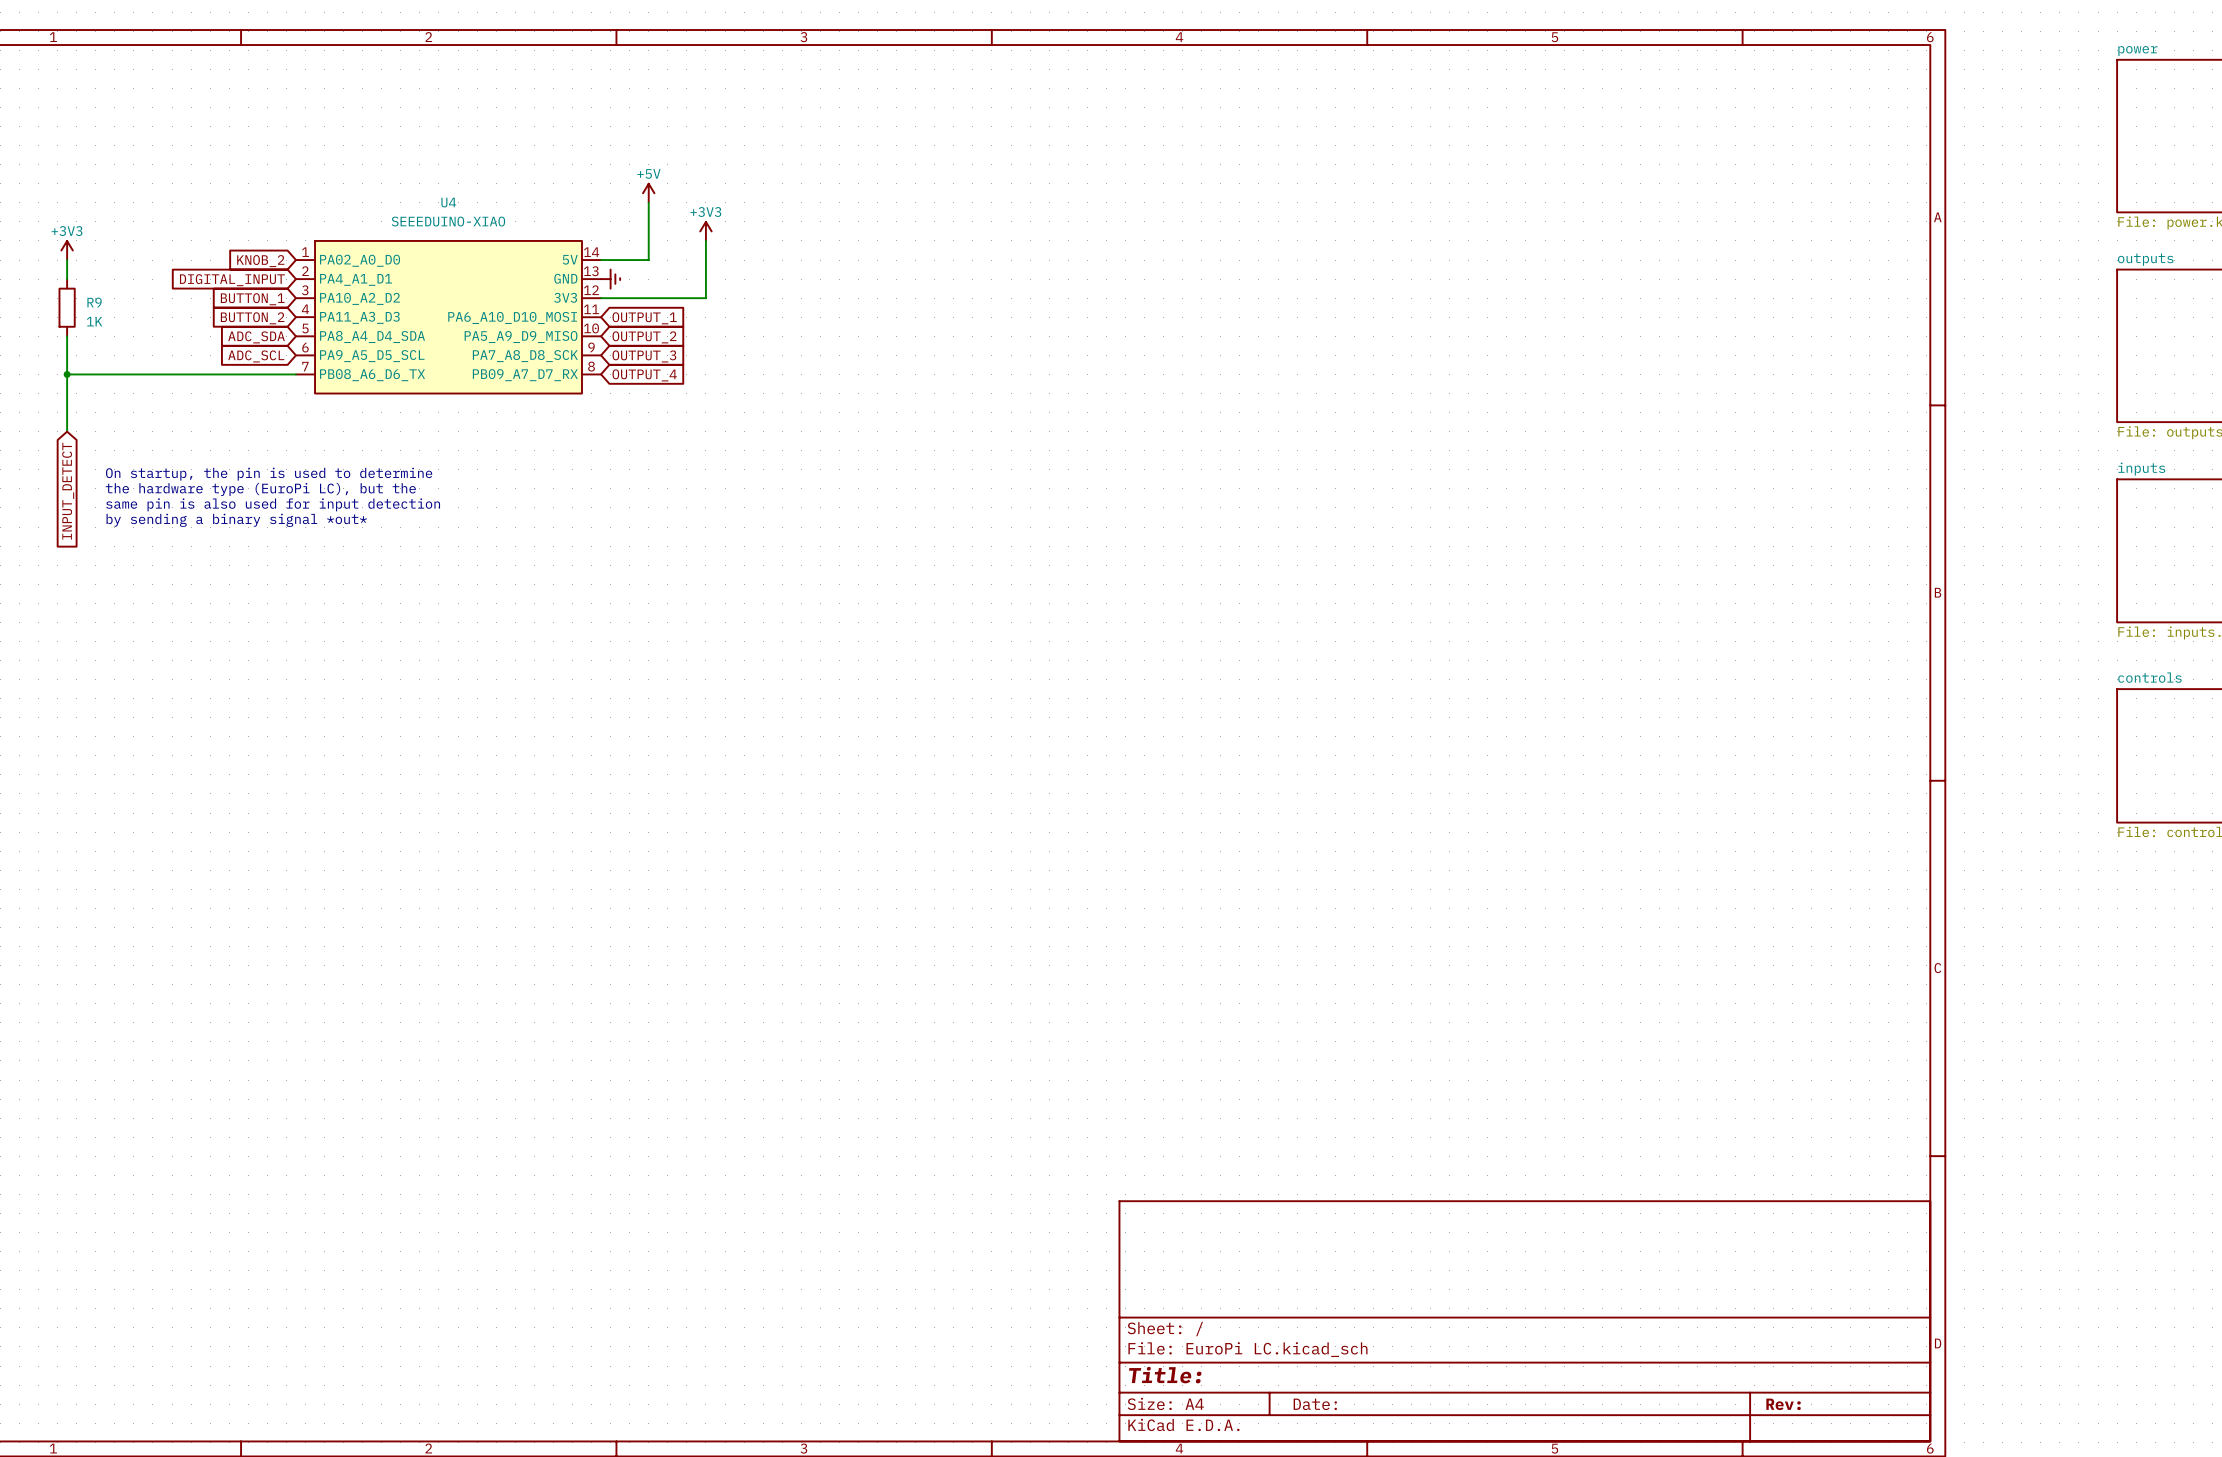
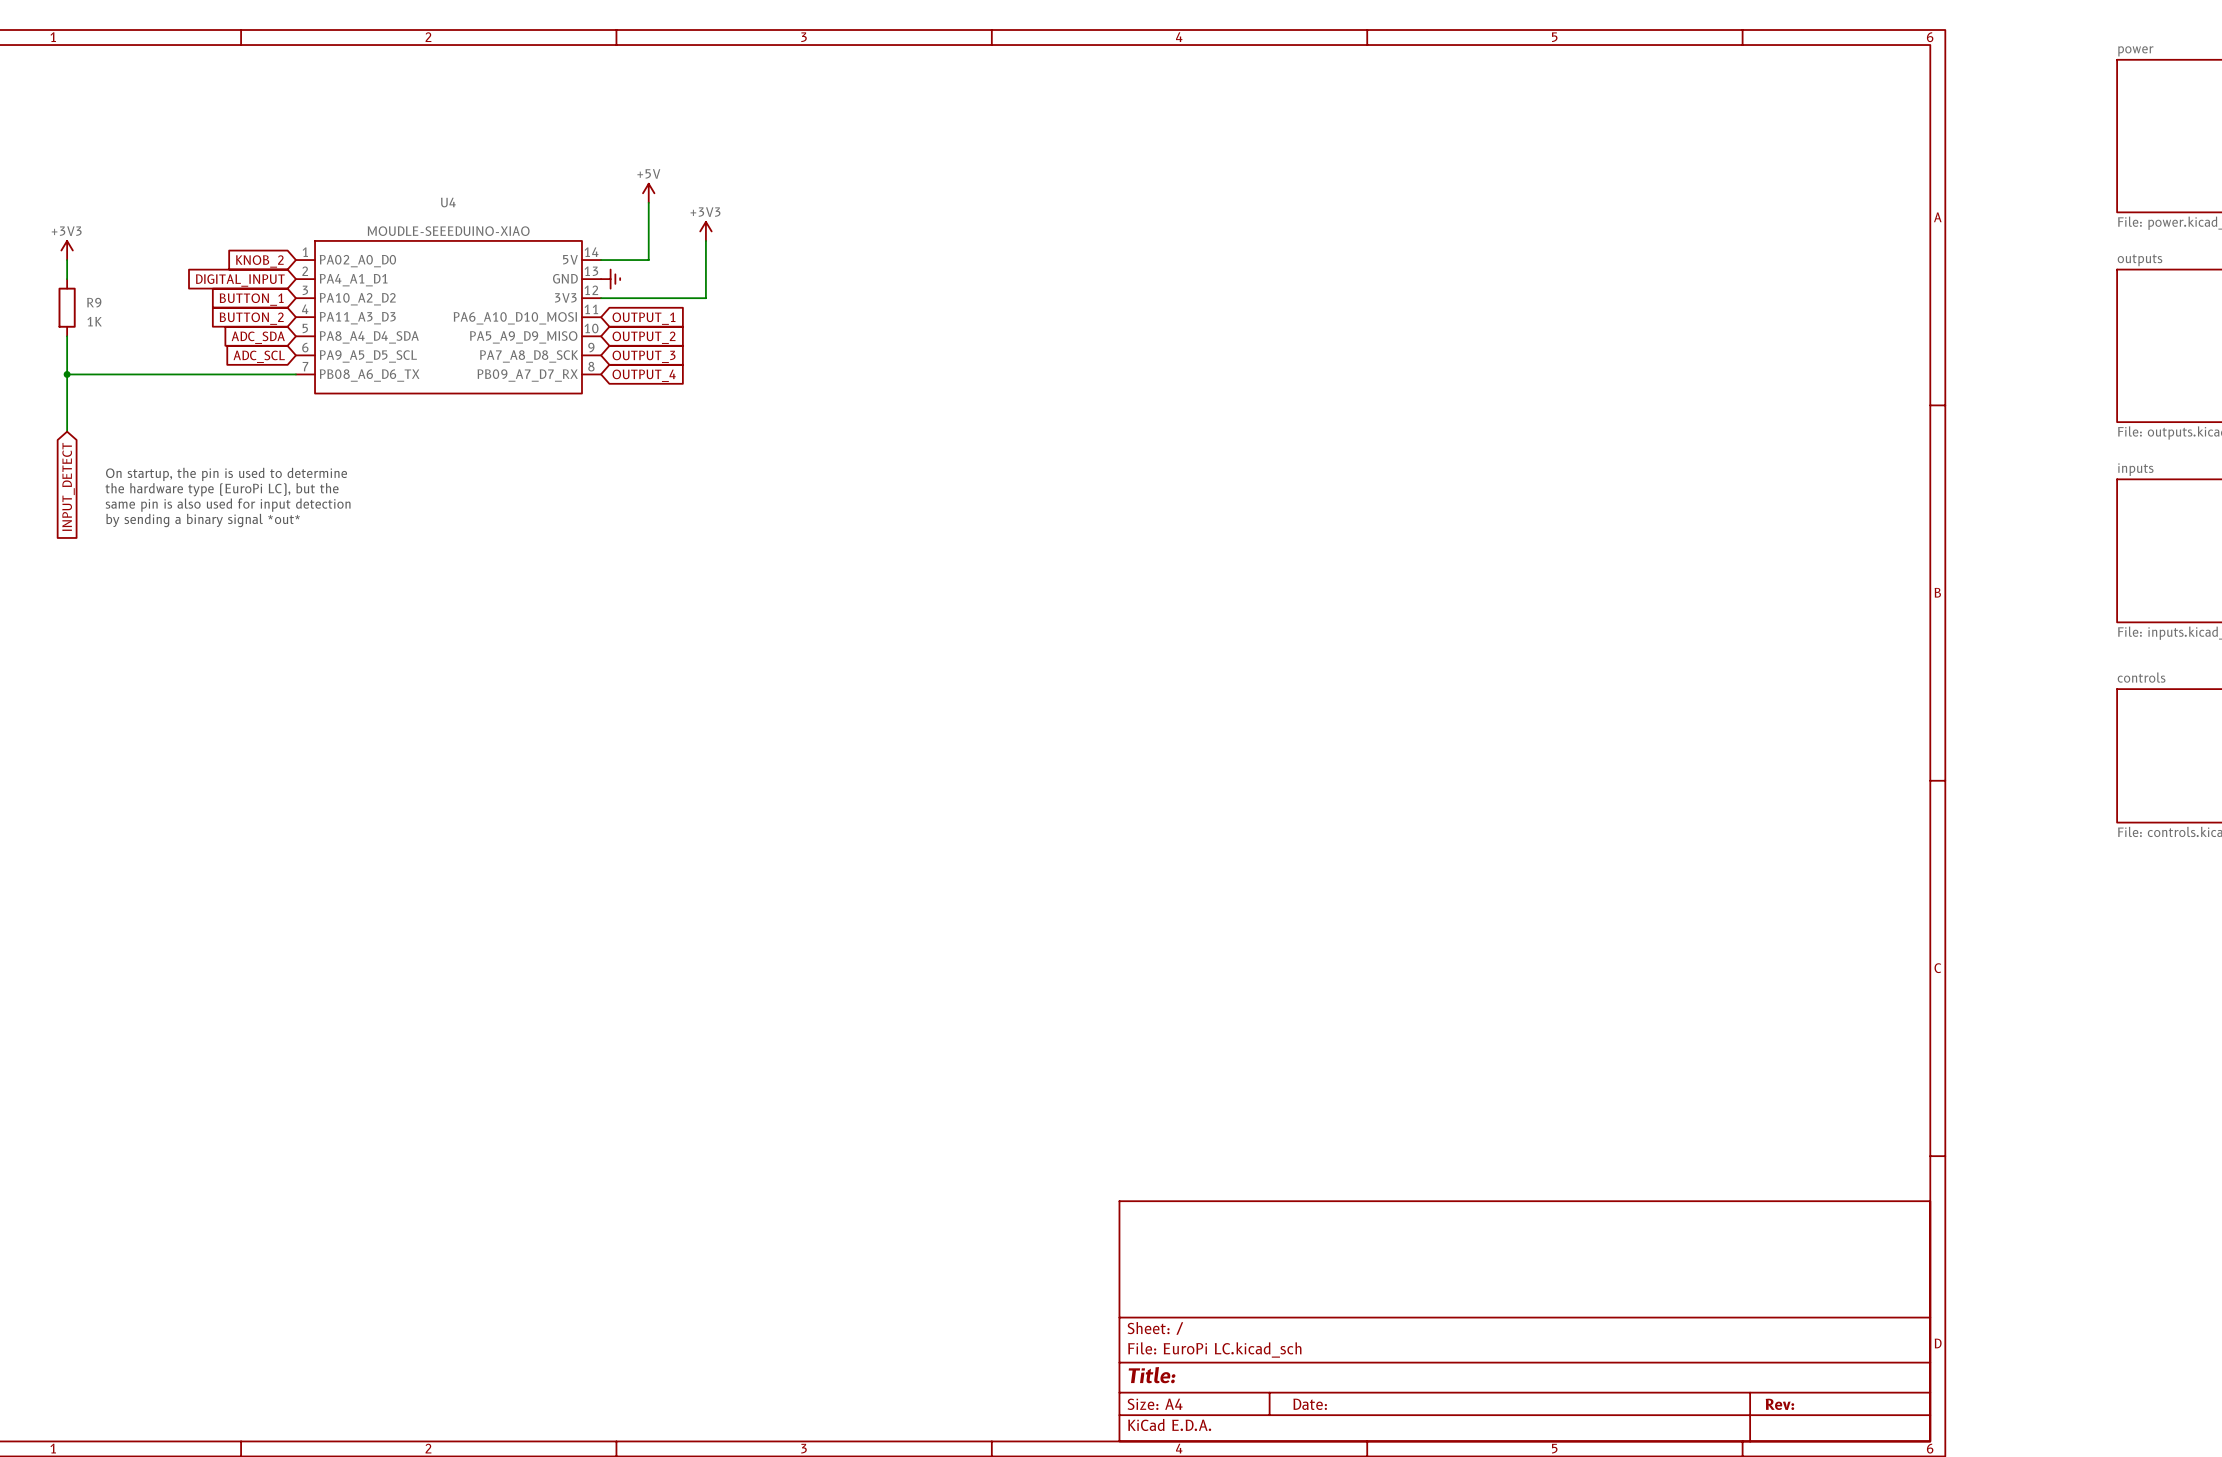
U4 value: SEEEDUINO-XIAO (448, 221) -> MOUDLE-SEEEDUINO-XIAO (448, 231)

